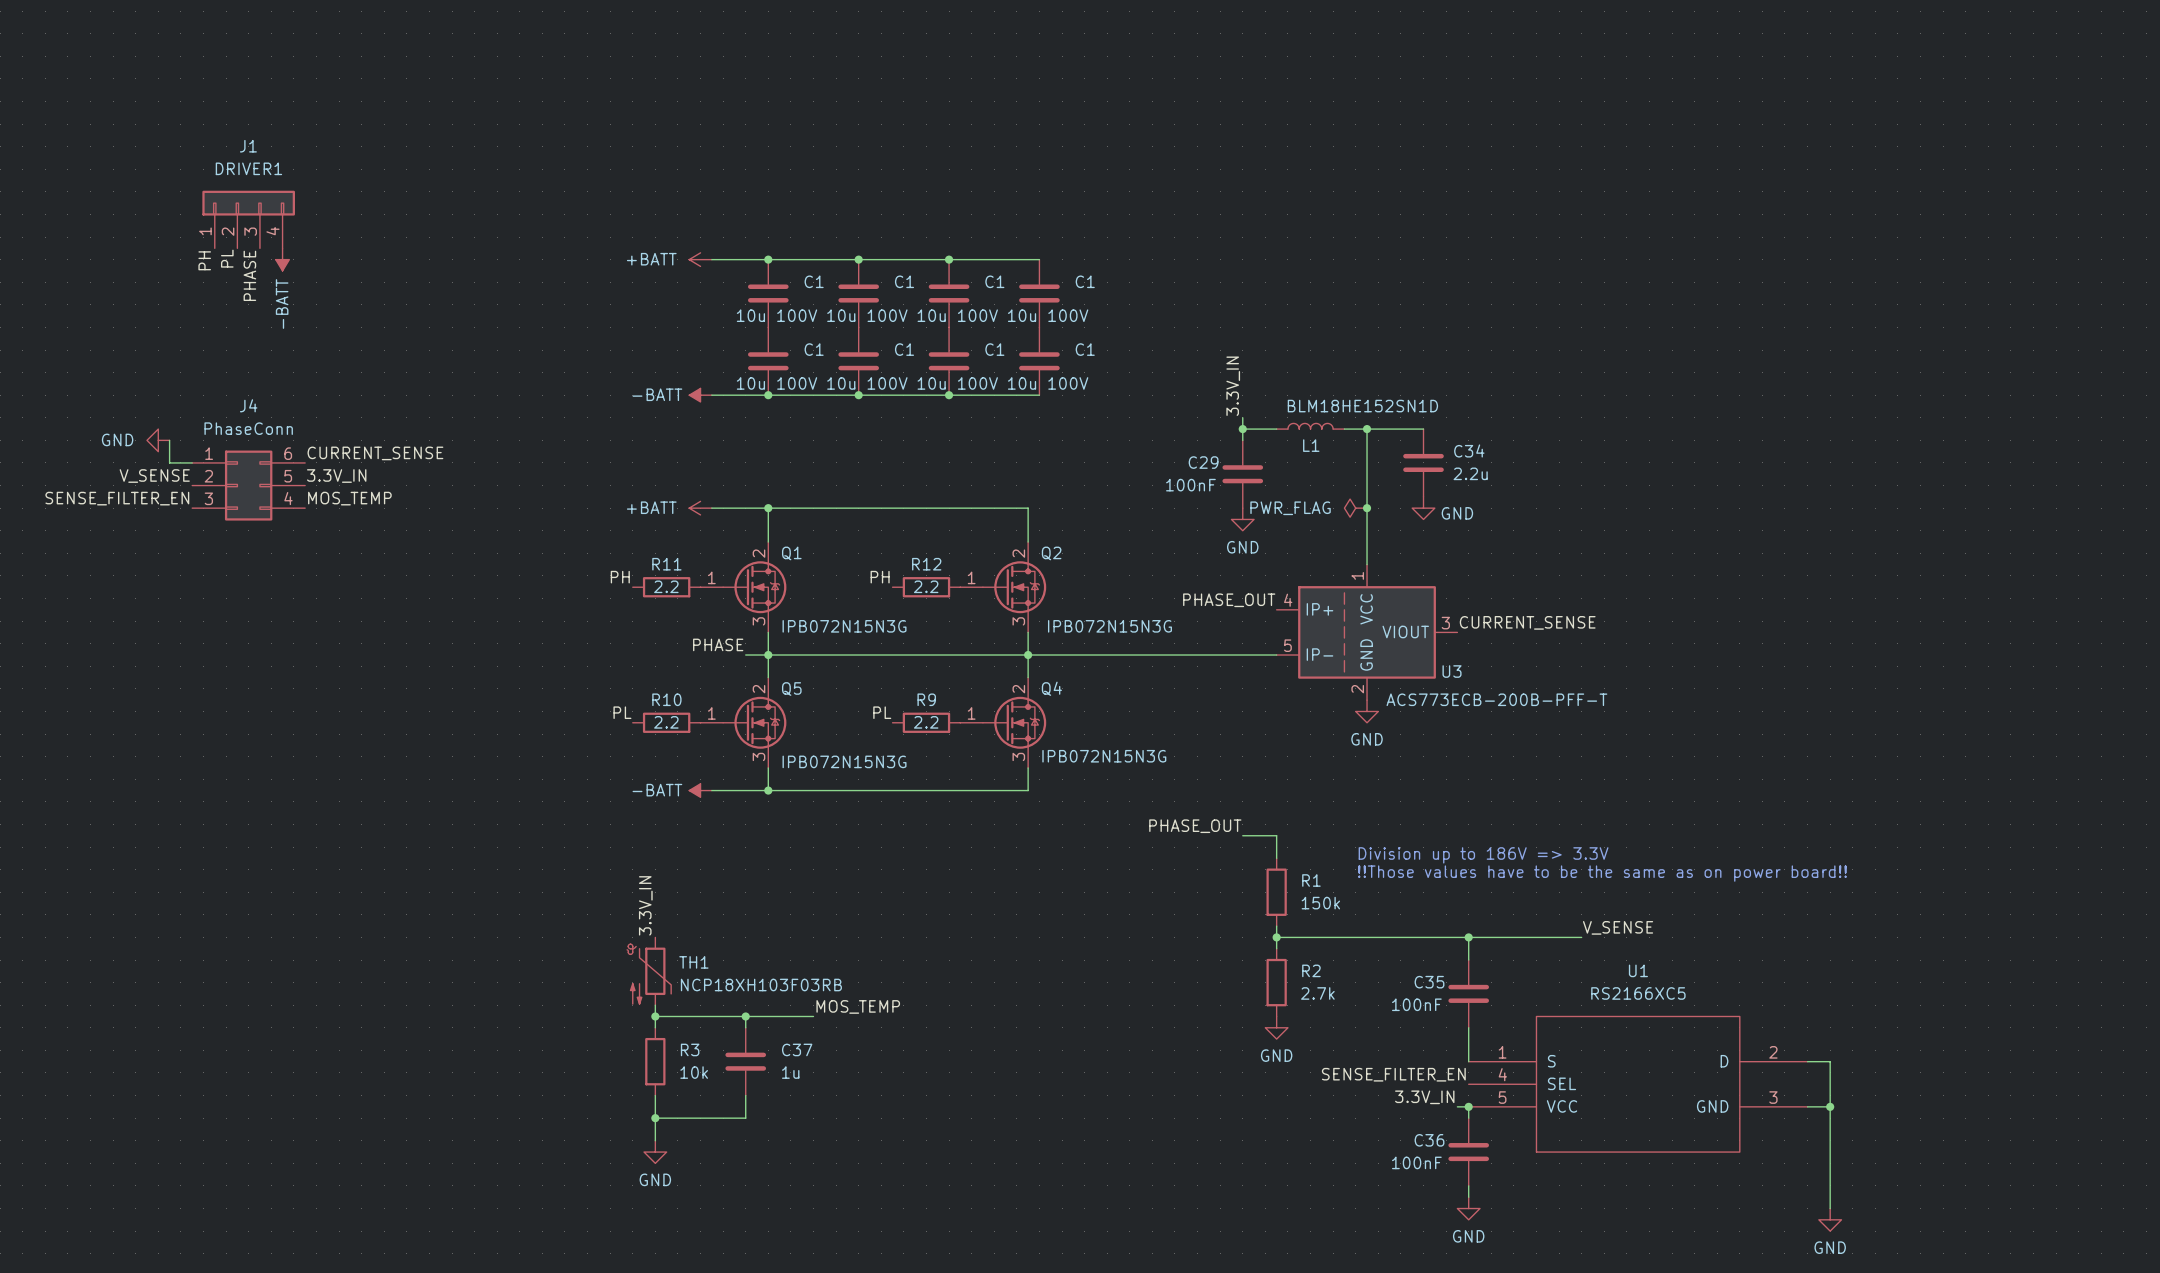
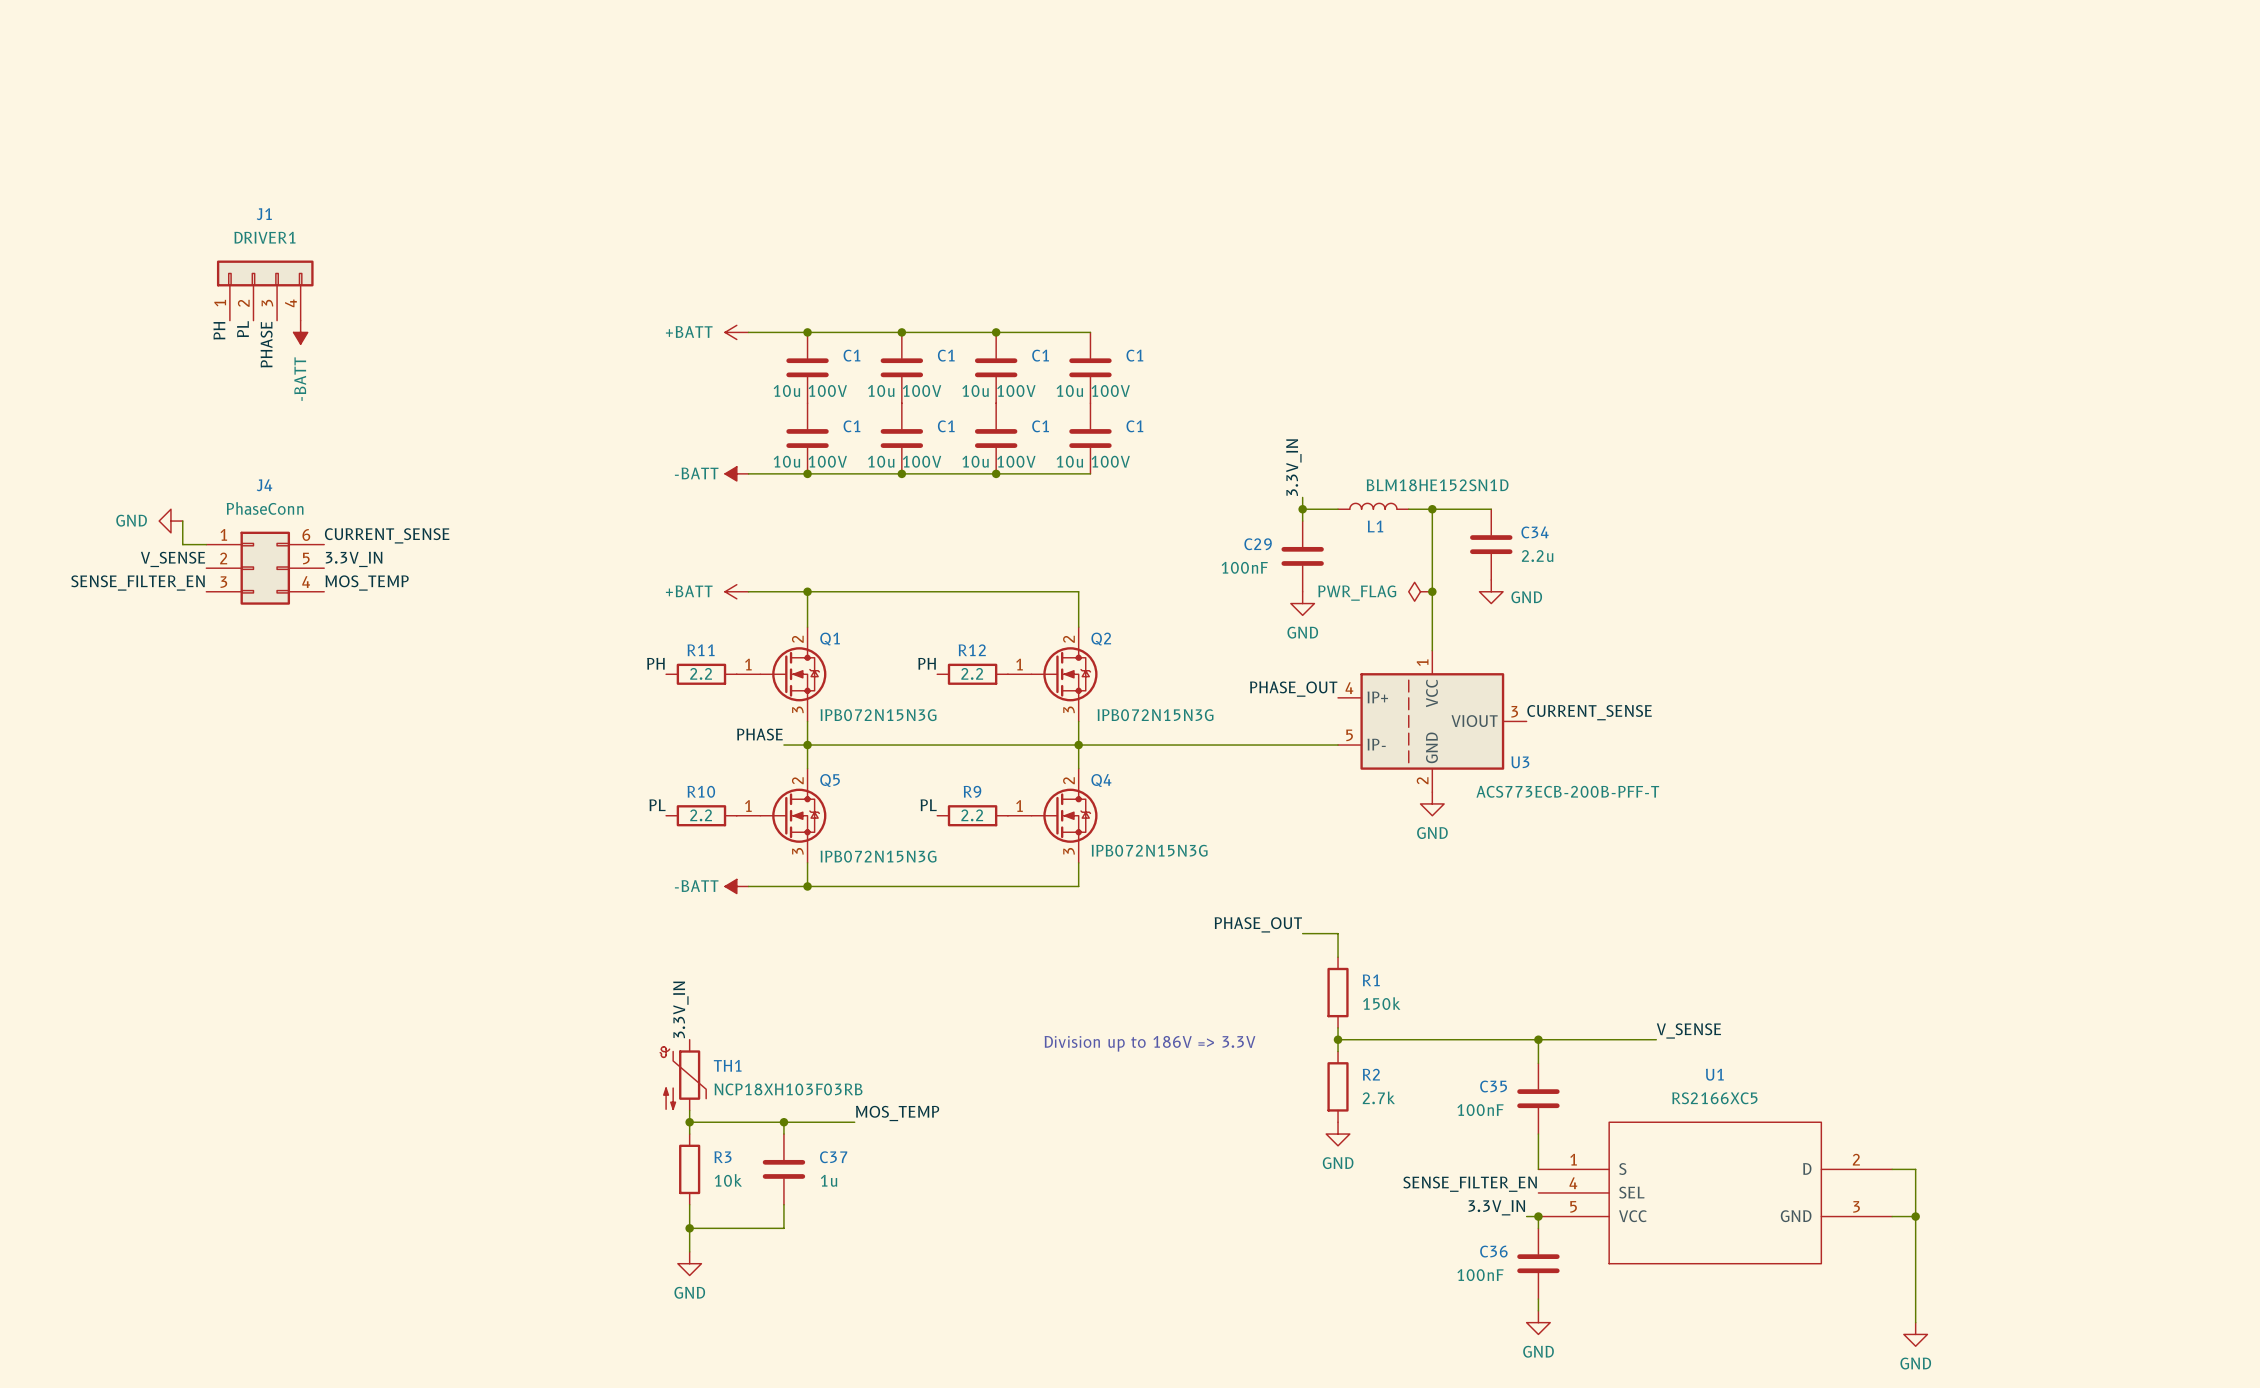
text: Division up to 186V => 3.3V (1483, 855) -> none
text: !!Those values have to be the same as on power board!! (1602, 873) -> none
text: none -> Division up to 186V => 3.3V (1149, 1043)

